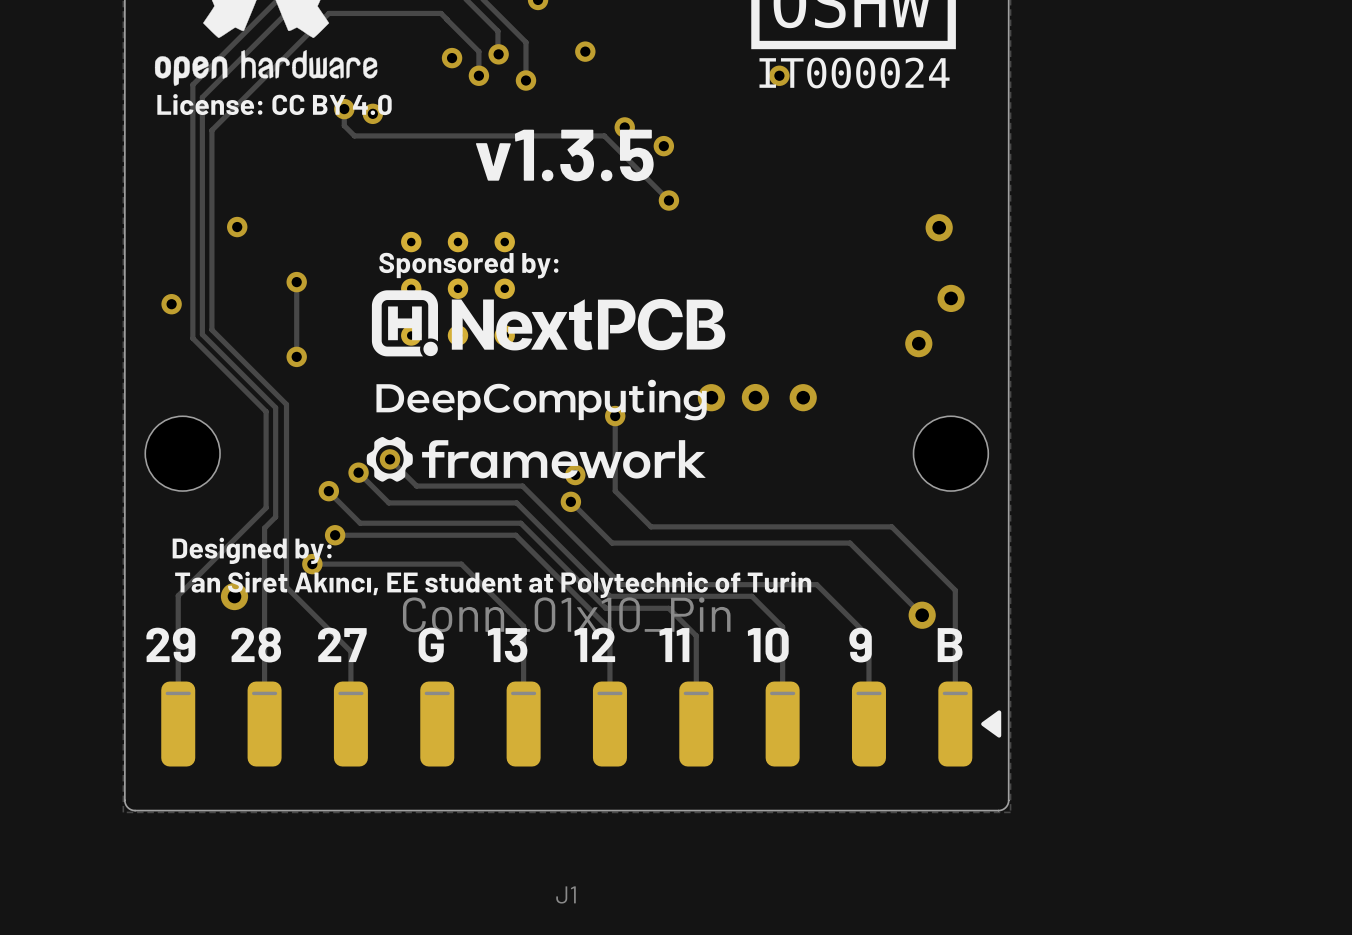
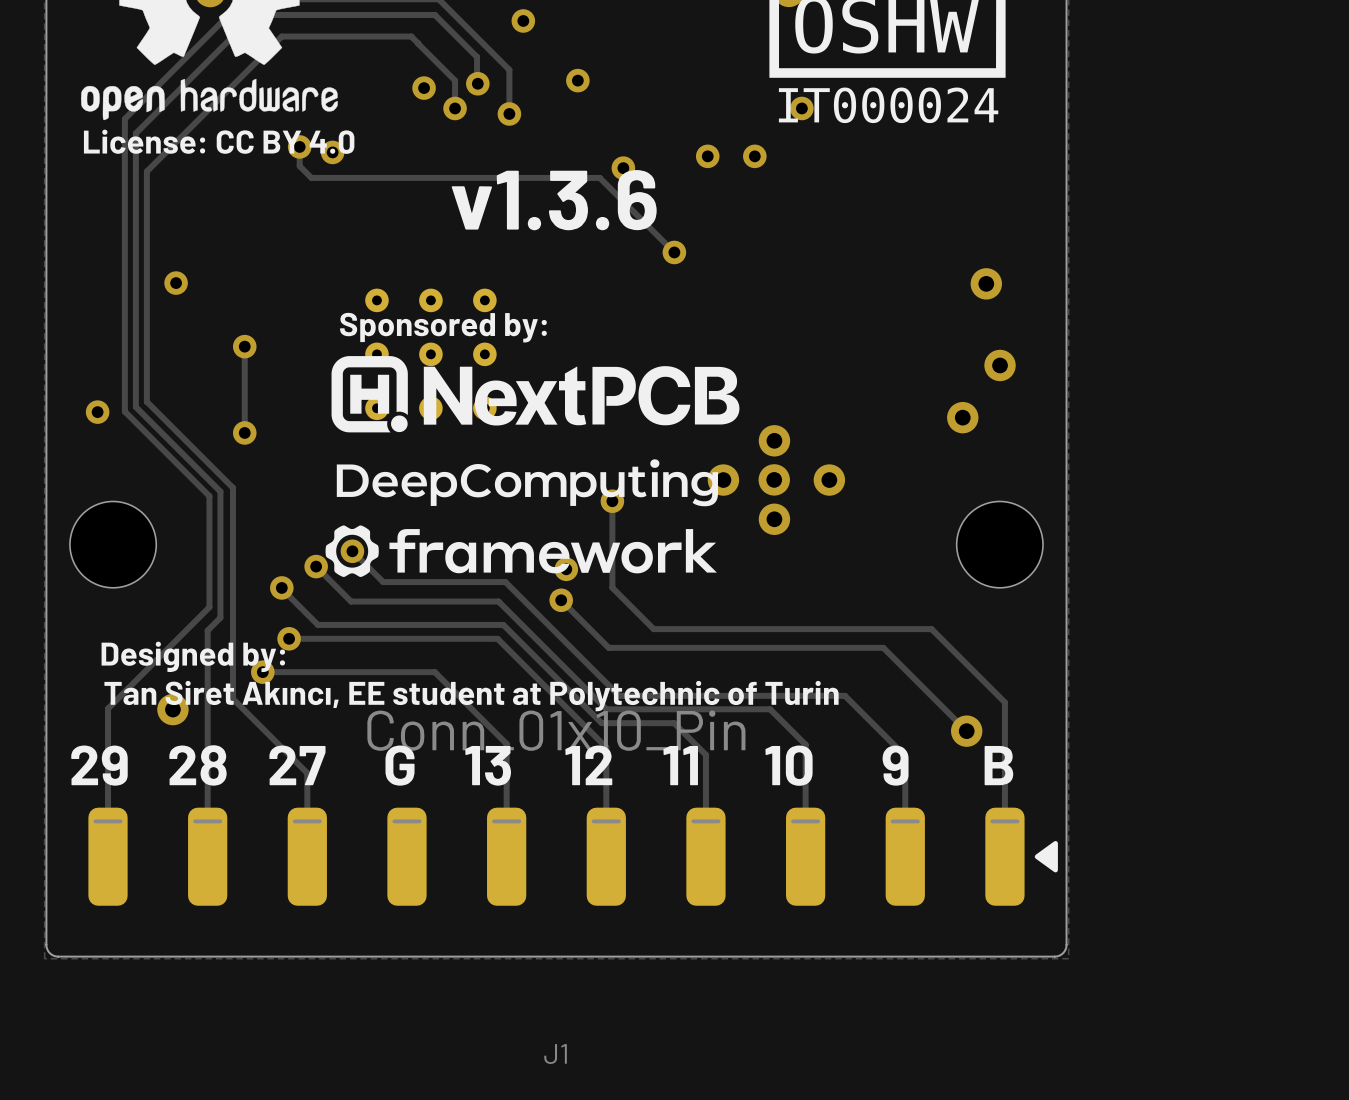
via: none -> (707, 156)
via: none -> (754, 156)
via: (663, 146) -> none
text: v1.3.5 (564, 155) -> v1.3.6 (554, 200)
via position: (171, 304) -> (97, 412)
via: none -> (774, 440)
via: none -> (774, 519)

